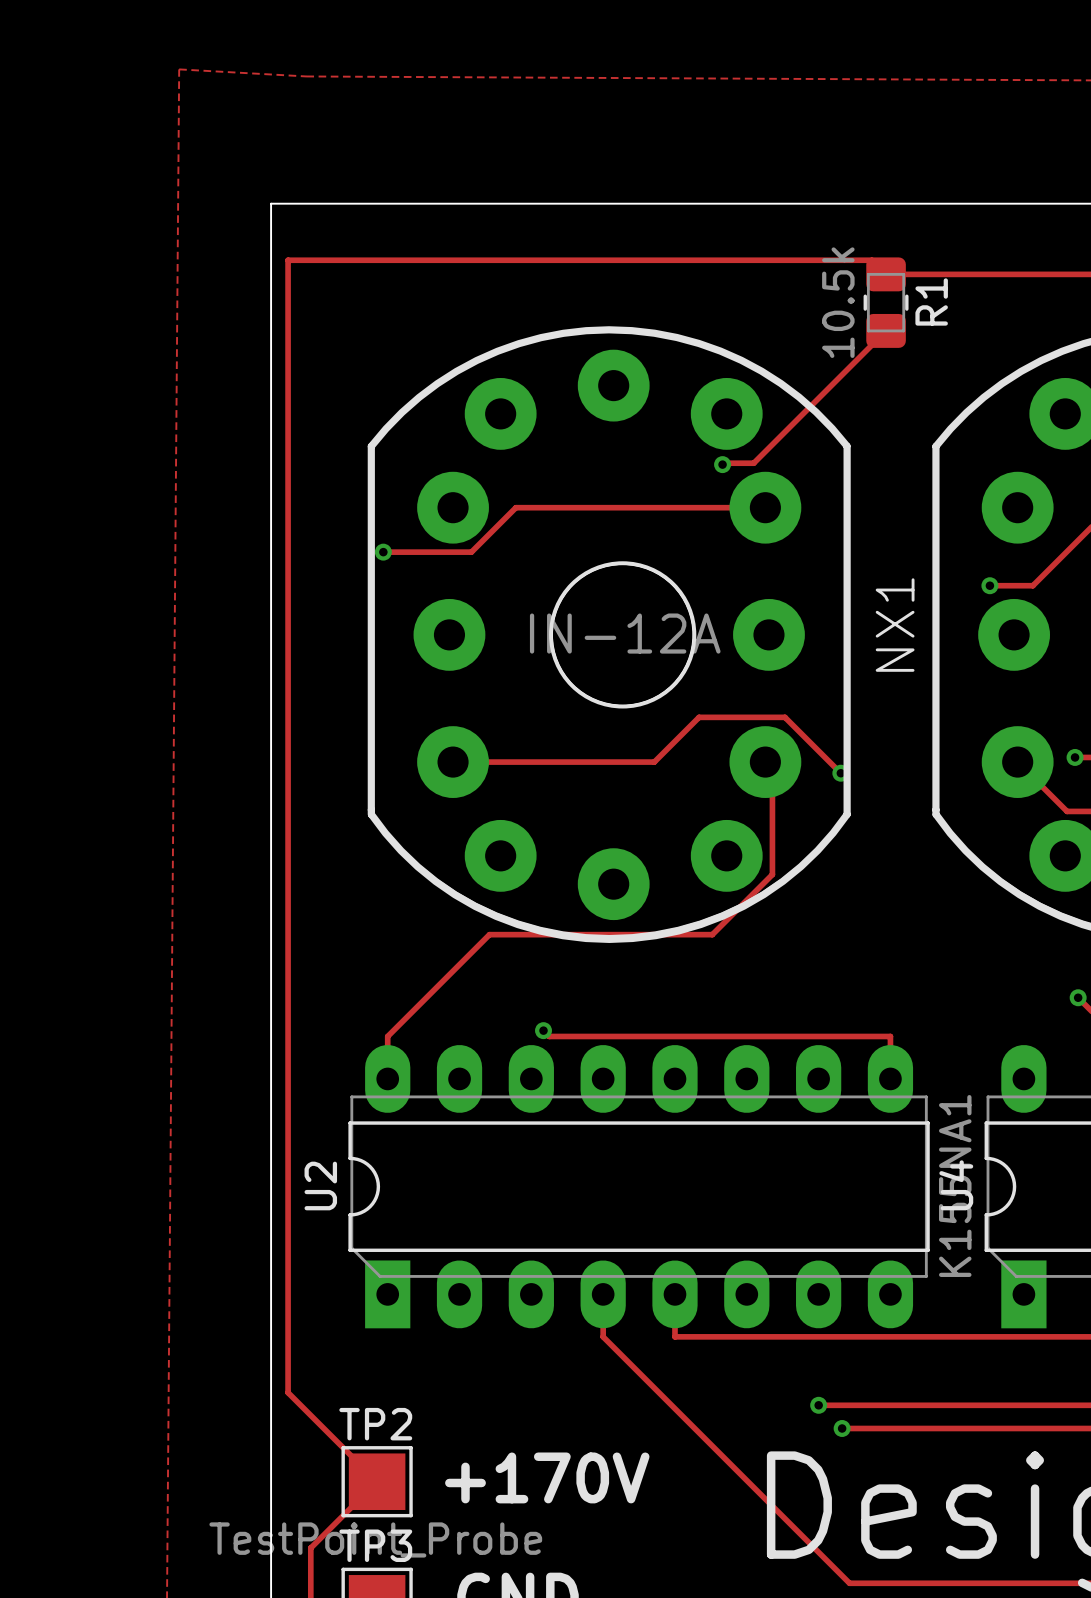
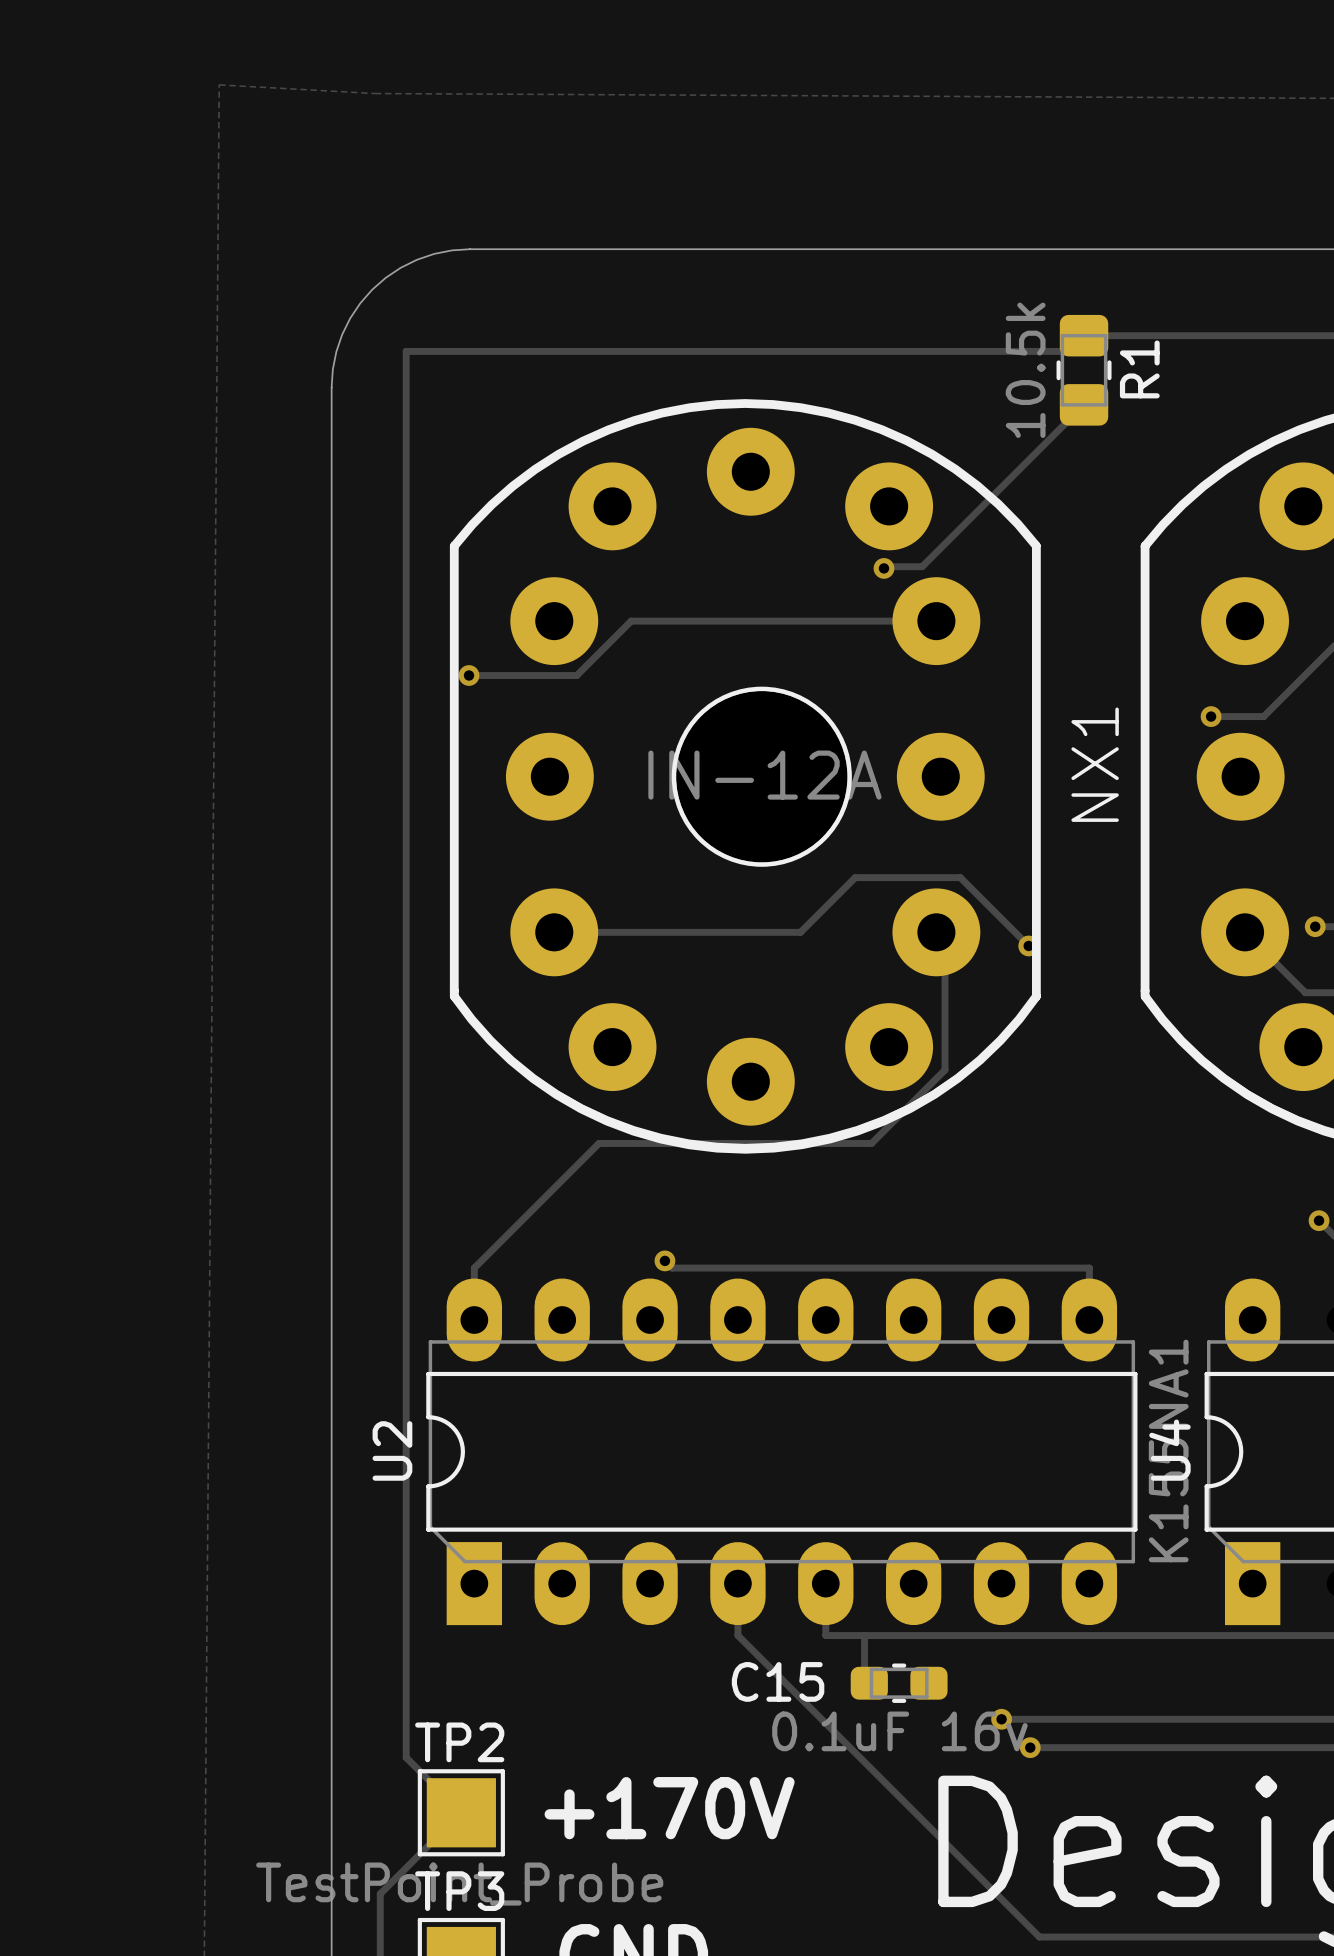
board edge: (384, 203) (271, 203) (271, 316) -> (470, 249) (451, 250) (417, 259) (400, 267) (372, 289) (350, 318) (342, 334) (332, 369) (331, 387)
track: (886, 274) (871, 260) (288, 260) (288, 1392) (332, 1436) -> (1084, 335) (1068, 351) (406, 351) (406, 1757)
track: none -> (864, 1635) (864, 1678) (869, 1683)
C15: none -> 0.1uF 16v (899, 1683)

